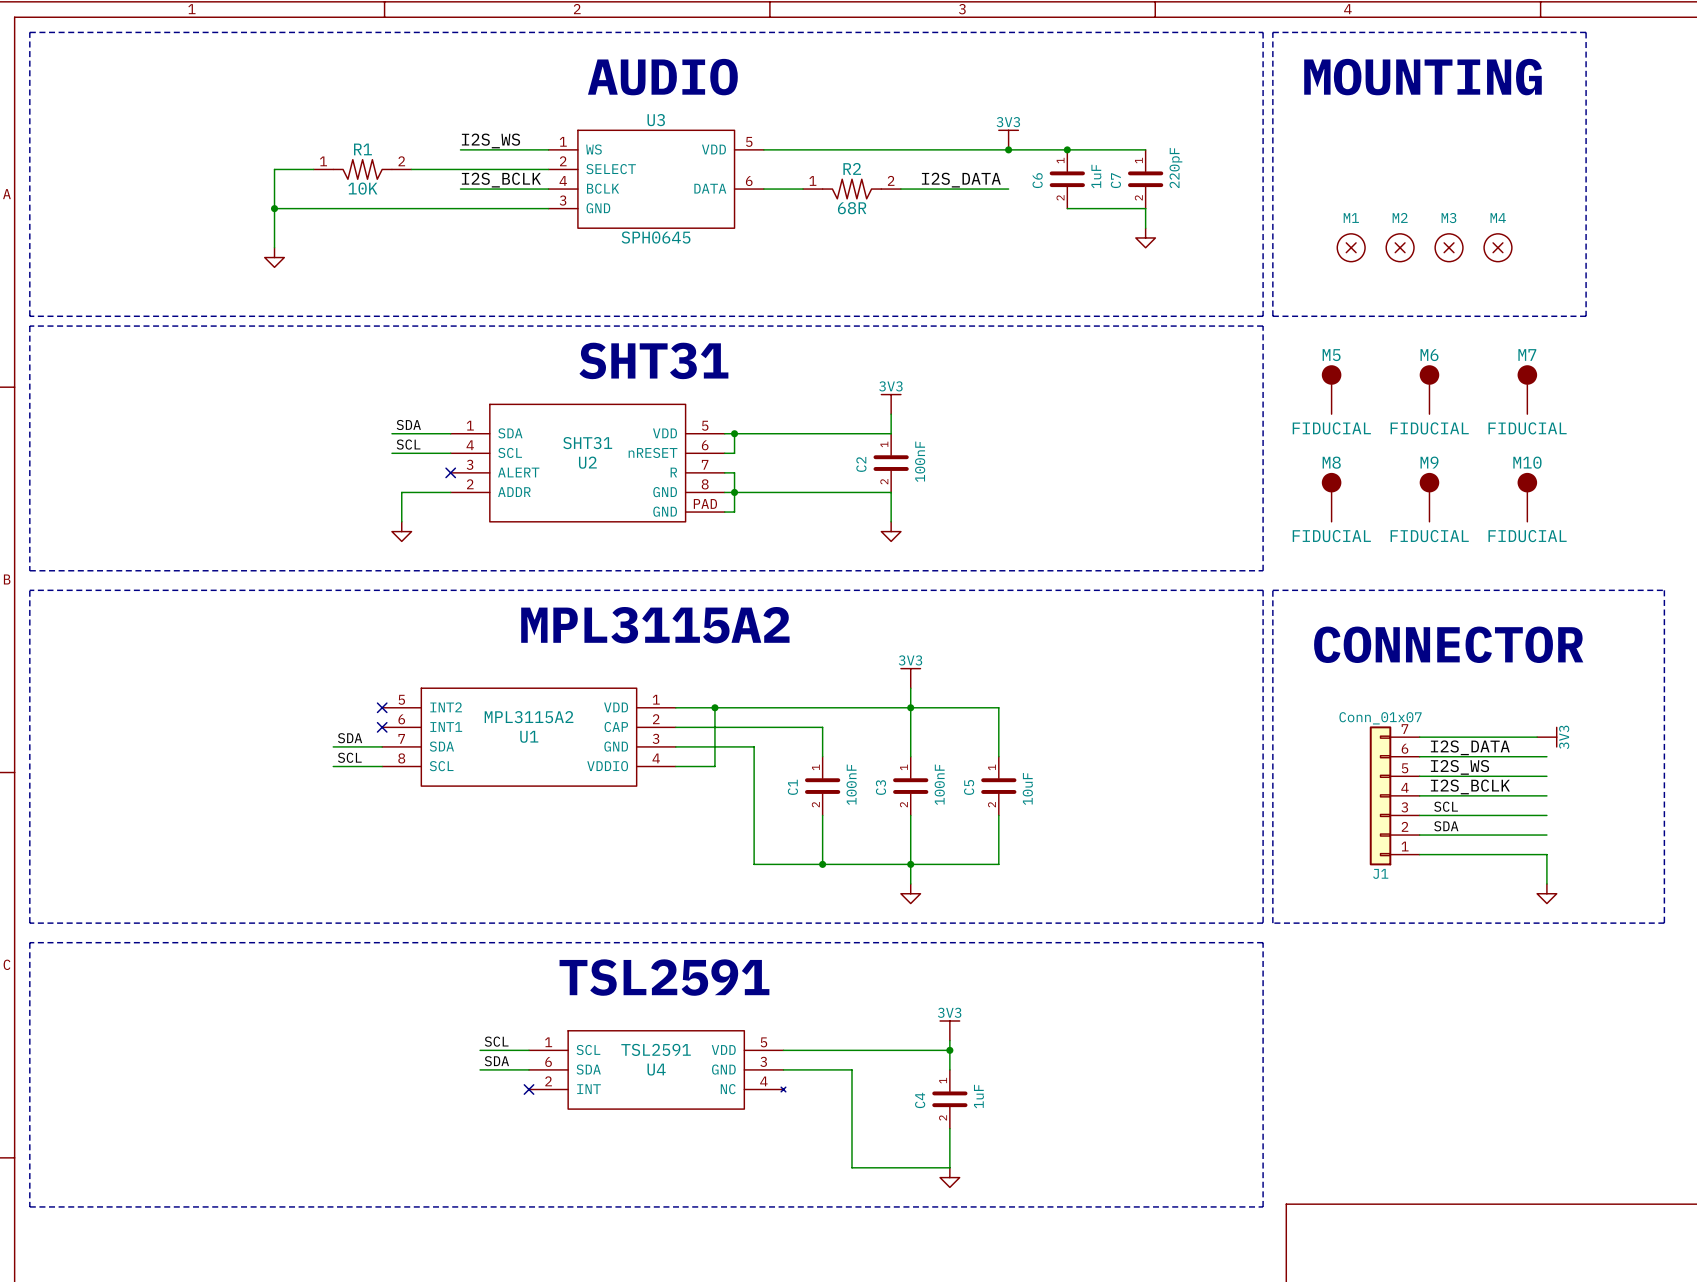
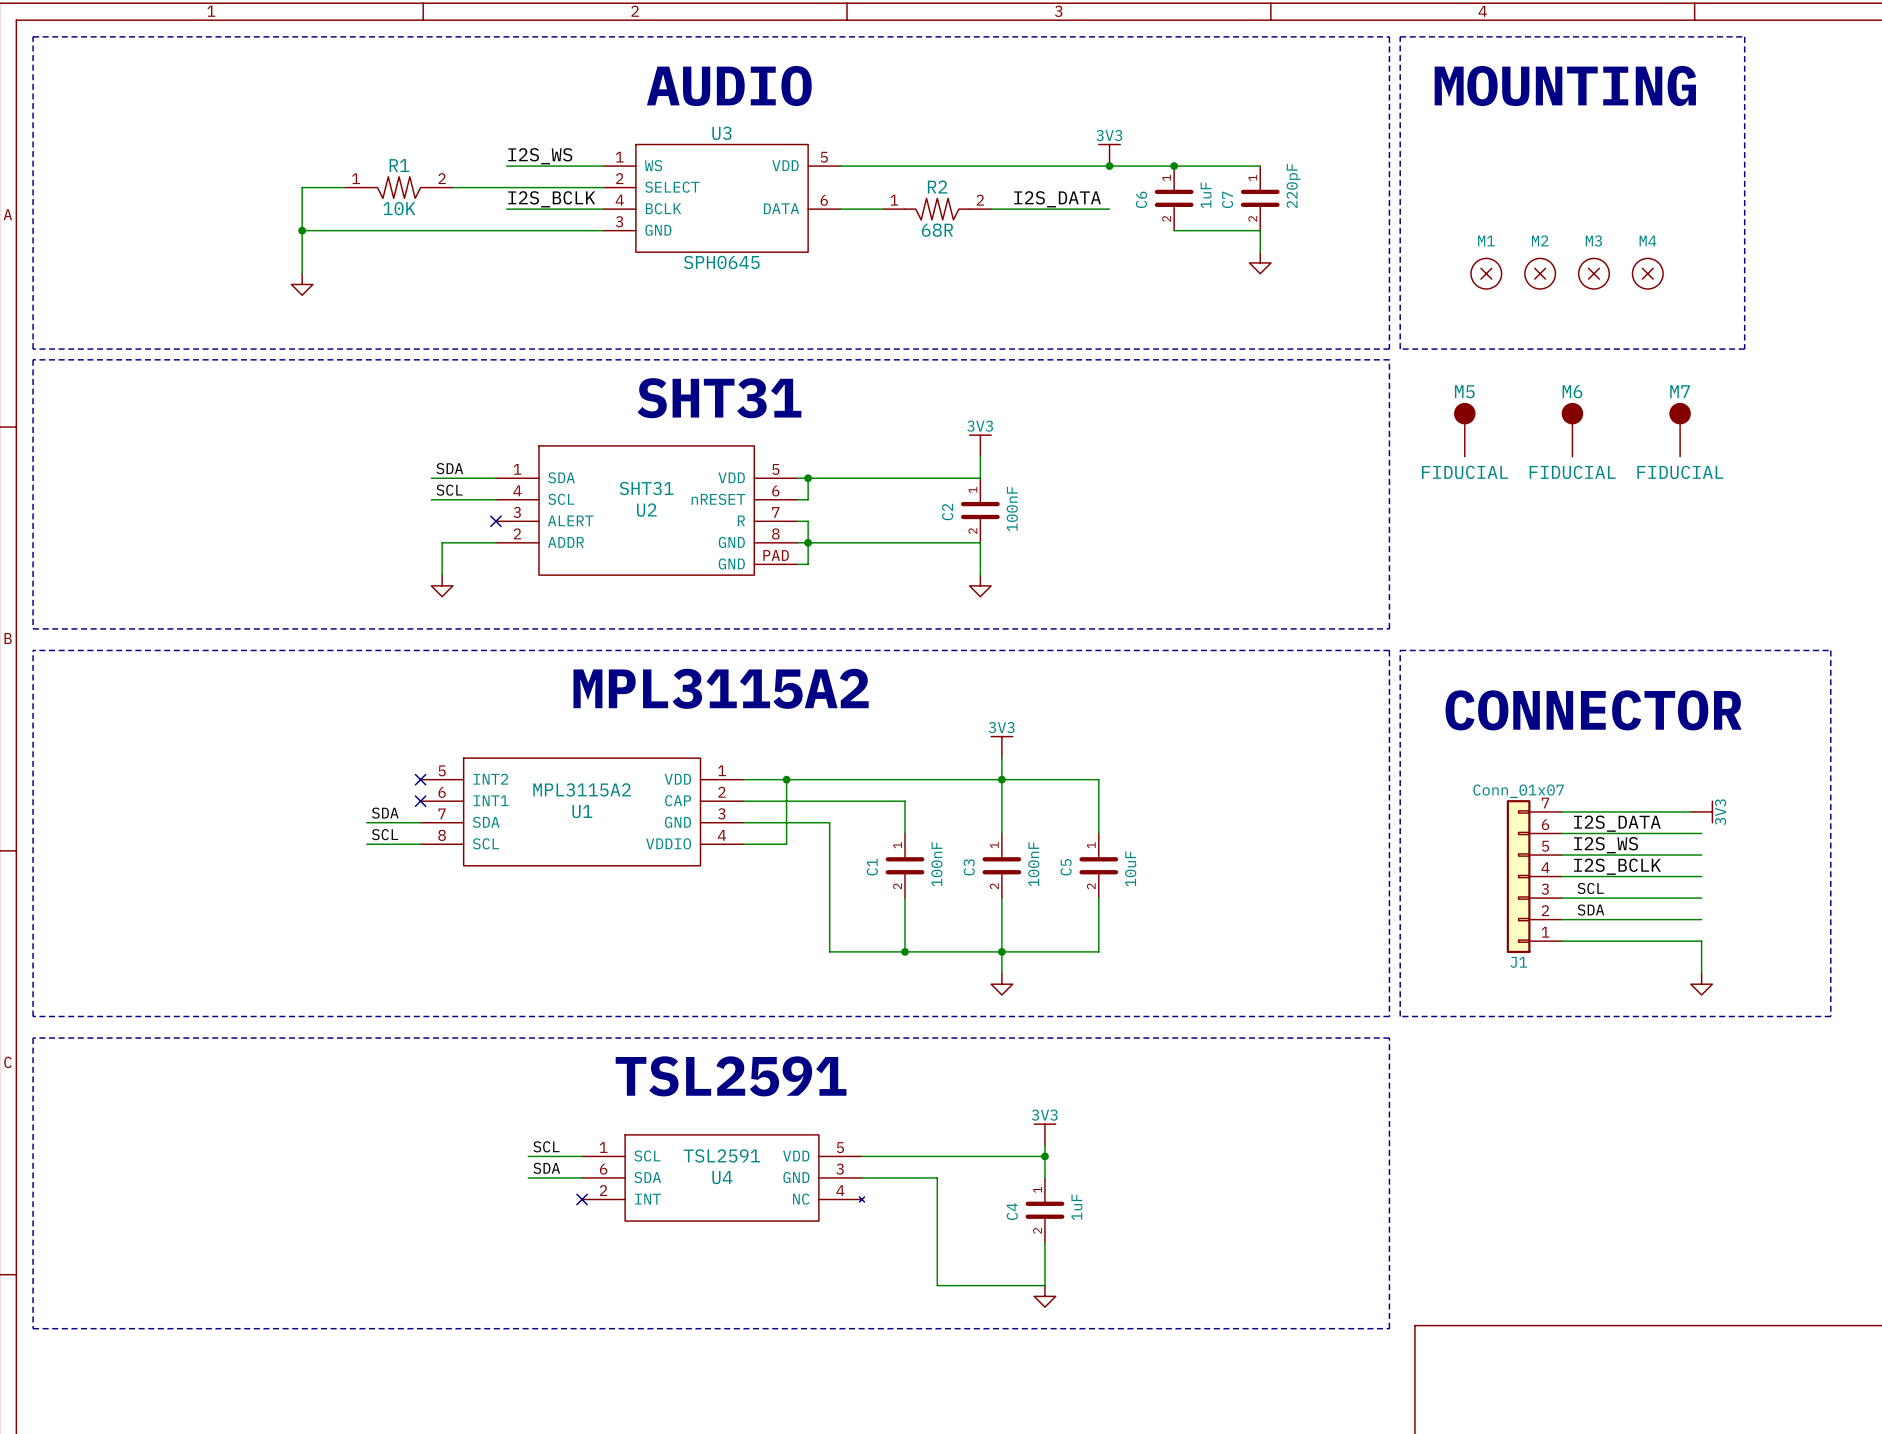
M8: FIDUCIAL (1331, 497) -> none
M9: FIDUCIAL (1429, 497) -> none
M10: FIDUCIAL (1527, 497) -> none

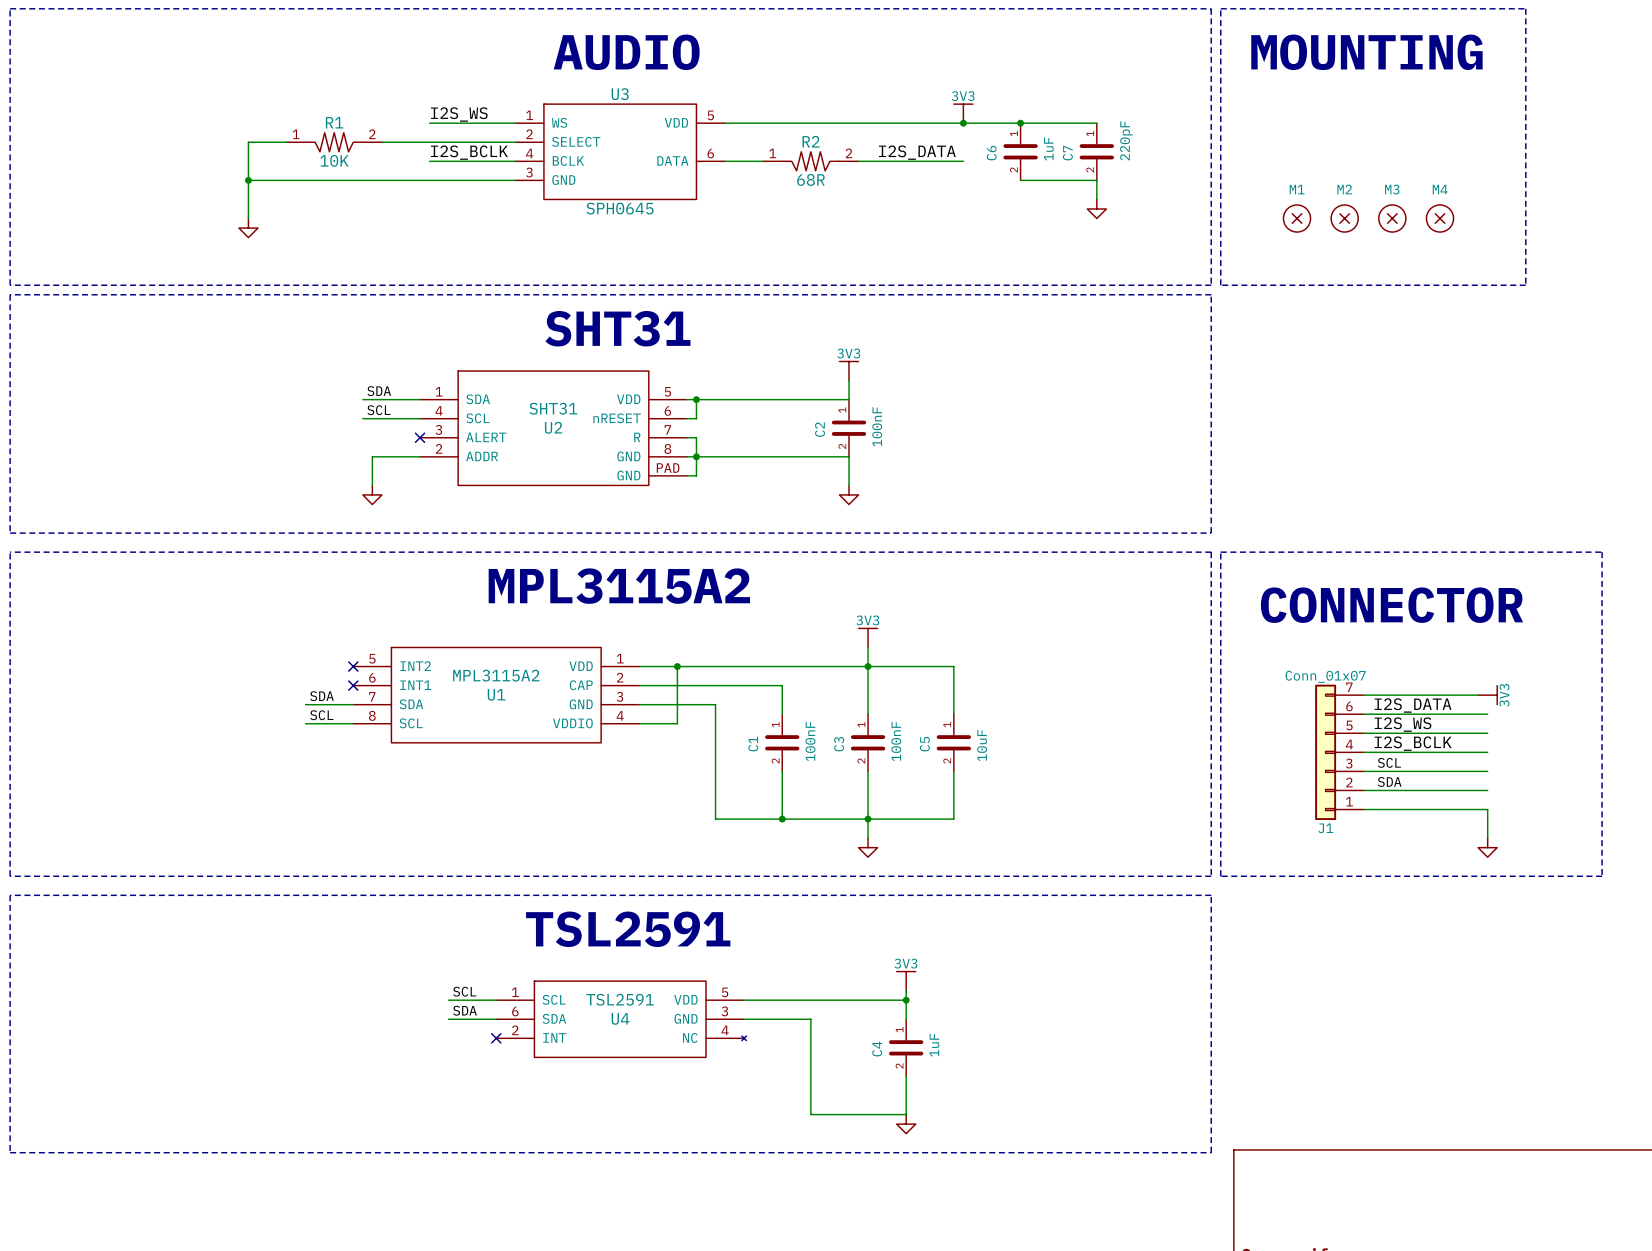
M5: FIDUCIAL (1464, 429) -> none
M6: FIDUCIAL (1572, 429) -> none
M7: FIDUCIAL (1680, 429) -> none

